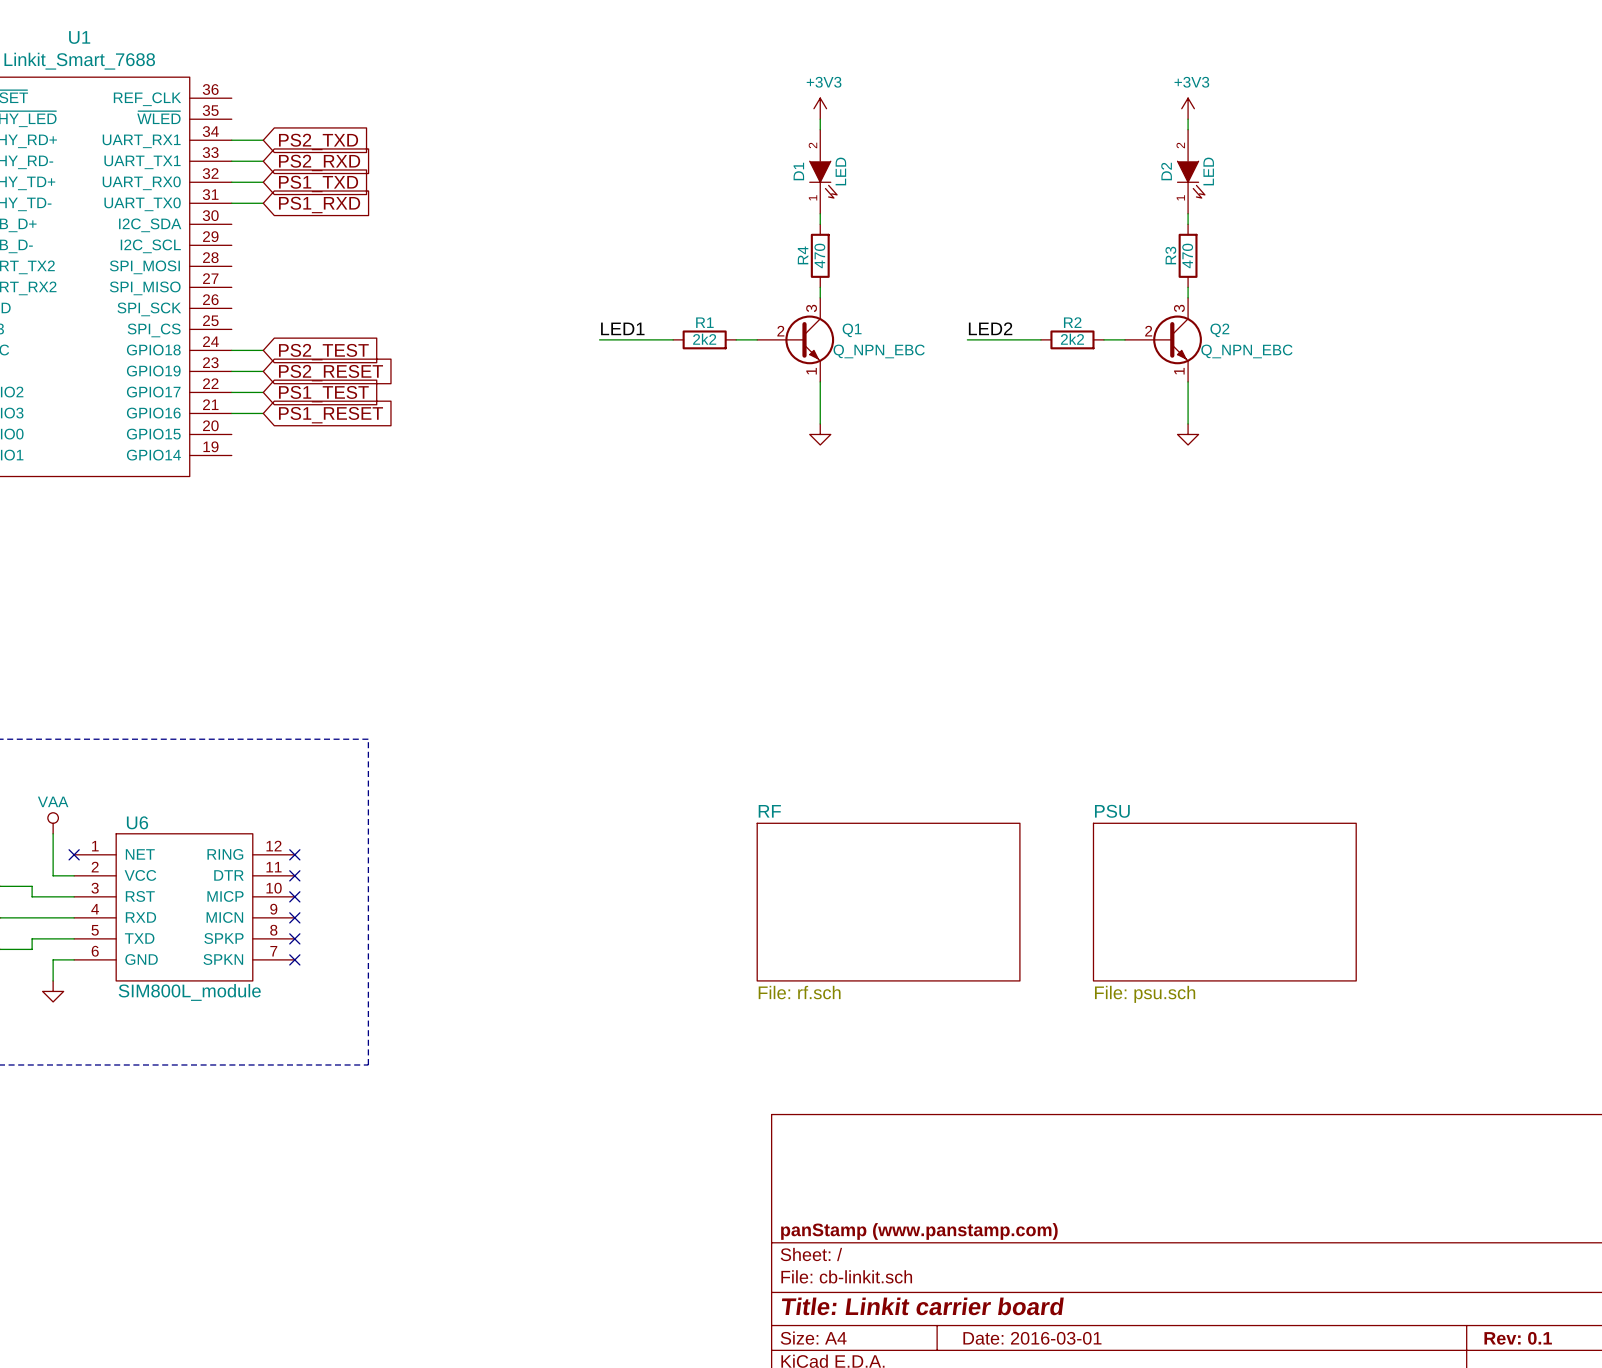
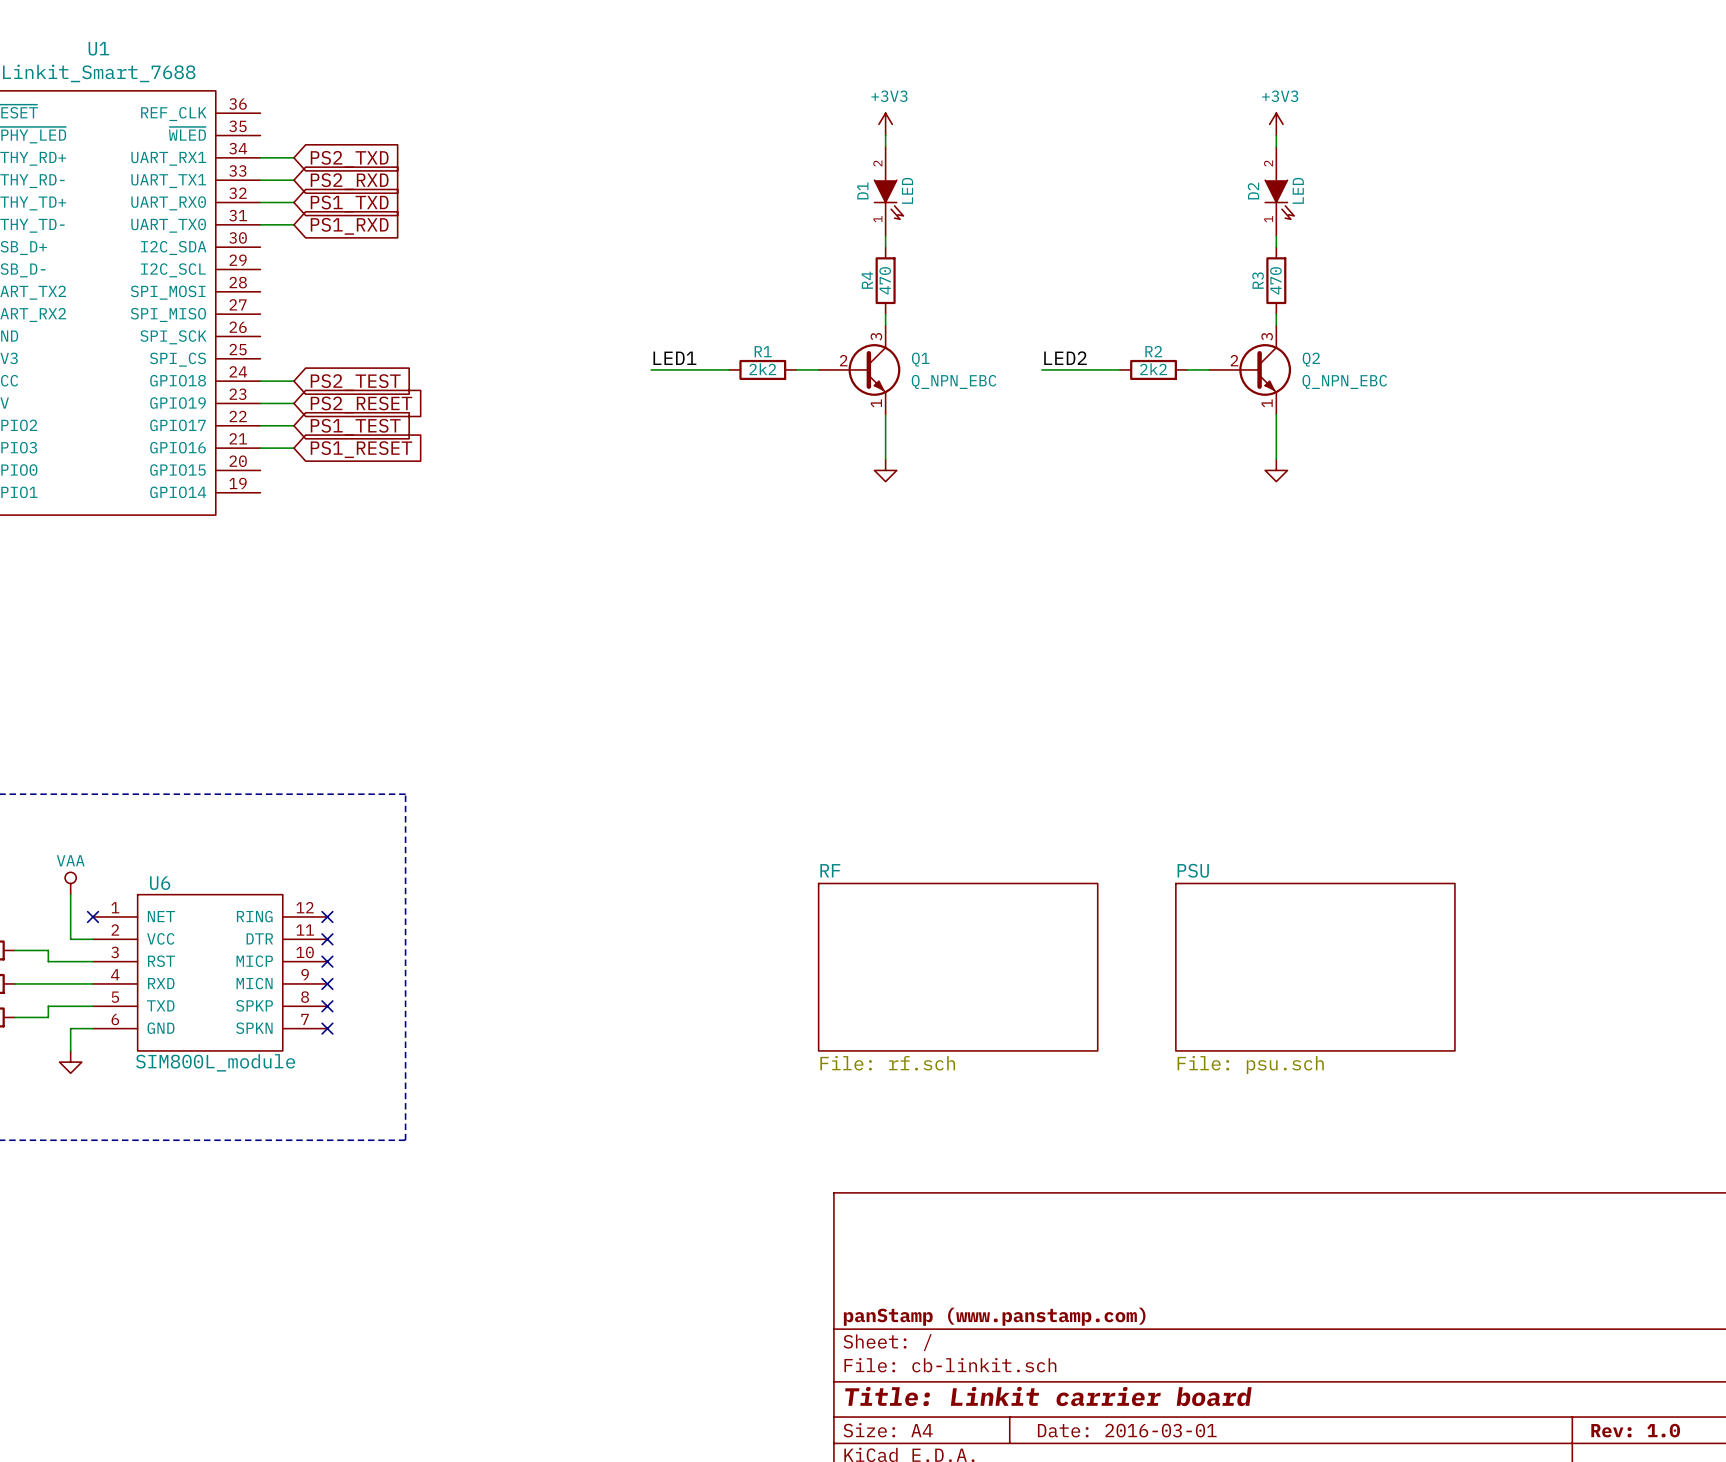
title block: Rev: 0.1 (1518, 1338) -> Rev: 1.0 (1635, 1430)

